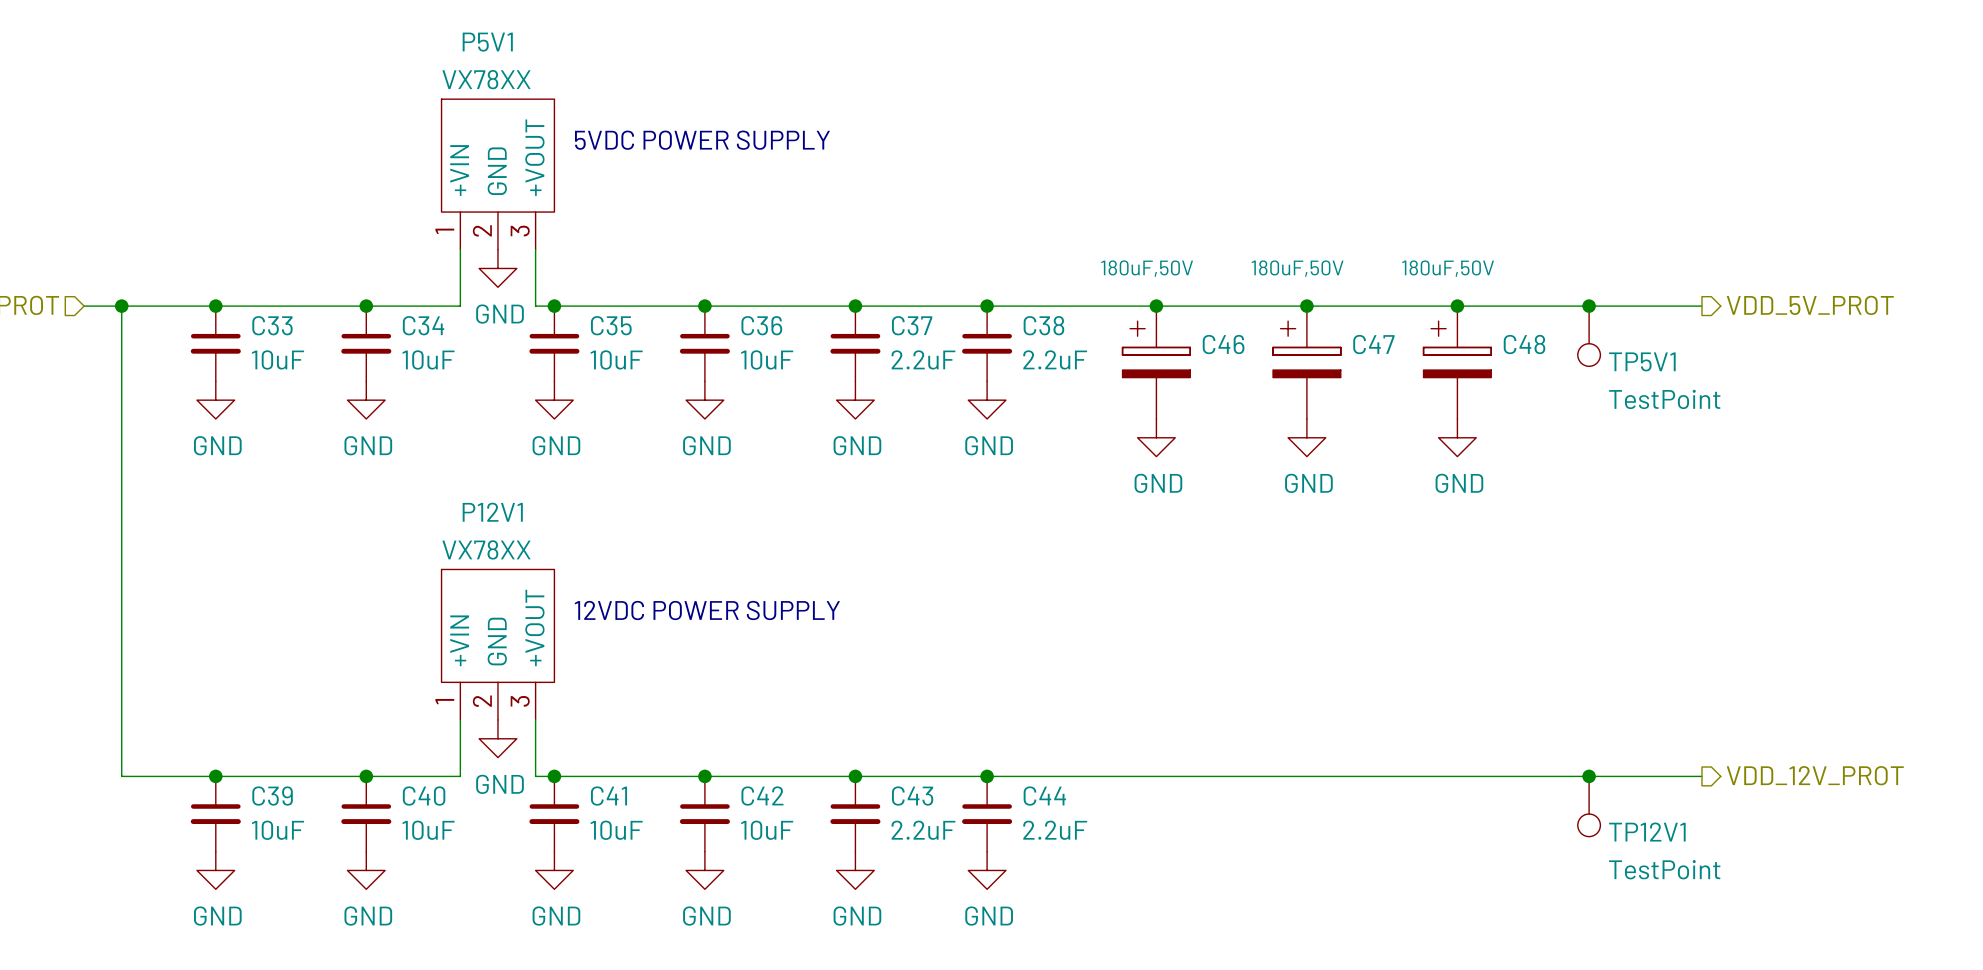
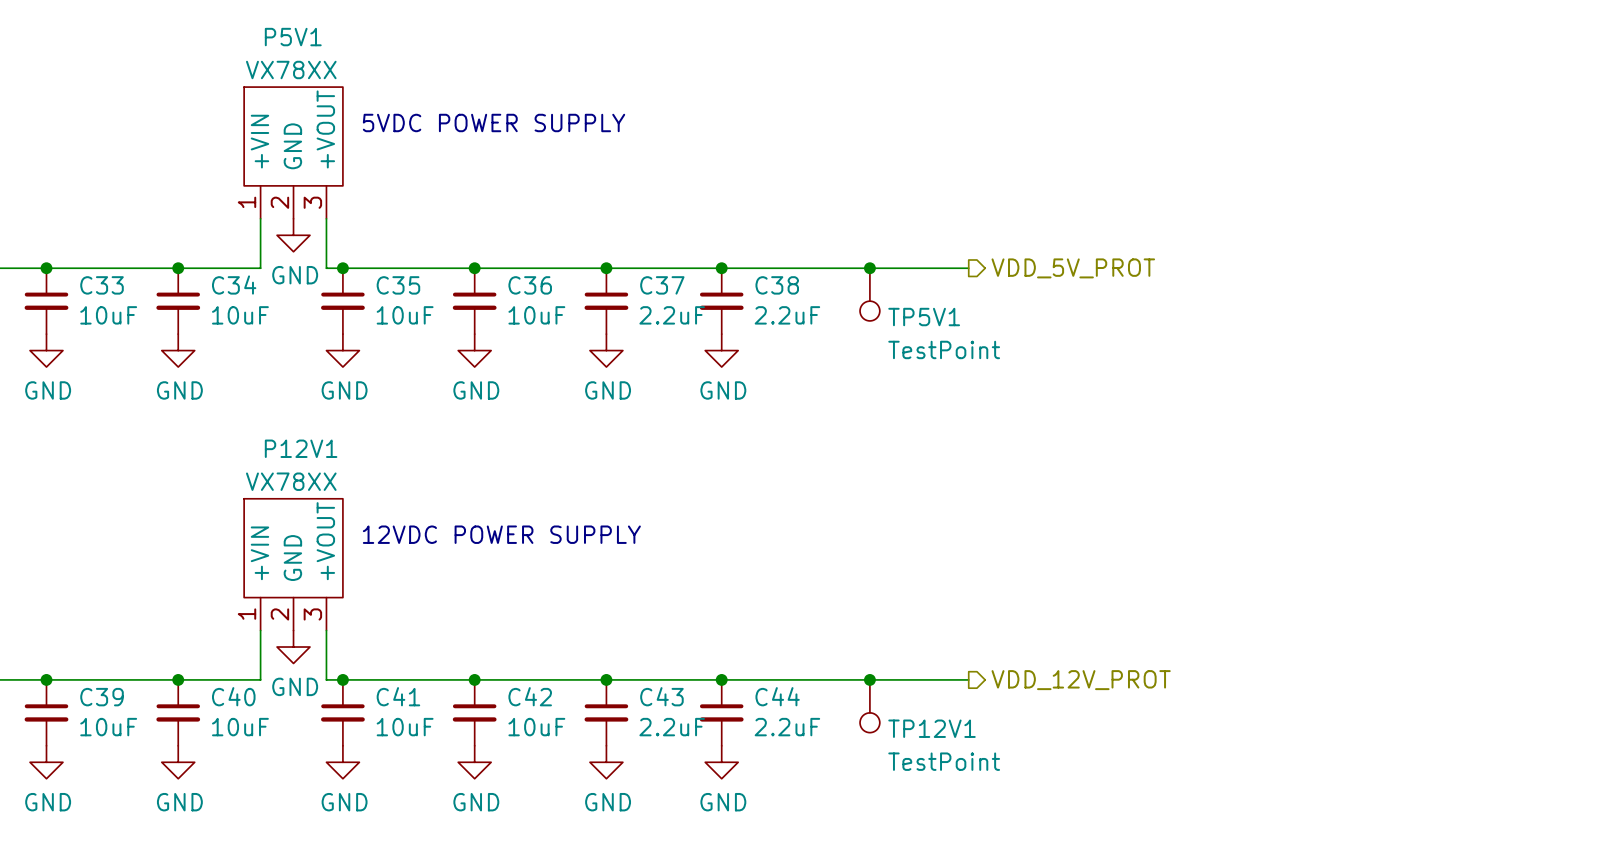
hierarchical label: none -> VDD_5V_PROT (1073, 268)
hierarchical label: VDD_5V_PROT (1810, 305) -> none
wire: (1269, 306) (1701, 306) -> none
junction: (1306, 306) -> none
junction: (1457, 306) -> none
junction: (1589, 306) -> none
TP5V1 position: (1589, 336) -> (869, 294)
C46: 180uF,50V (1156, 362) -> none
C47: 180uF,50V (1306, 362) -> none
C48: 180uF,50V (1457, 362) -> none
power symbol: GND (1156, 437) -> none
power symbol: GND (1306, 437) -> none
power symbol: GND (1457, 437) -> none
hierarchical label: none -> VDD_12V_PROT (1081, 680)
hierarchical label: VDD_12V_PROT (1815, 775) -> none
junction: none -> (869, 679)
wire: (1269, 776) (1701, 776) -> none
junction: (1589, 776) -> none
TP12V1 position: (1589, 806) -> (869, 706)

